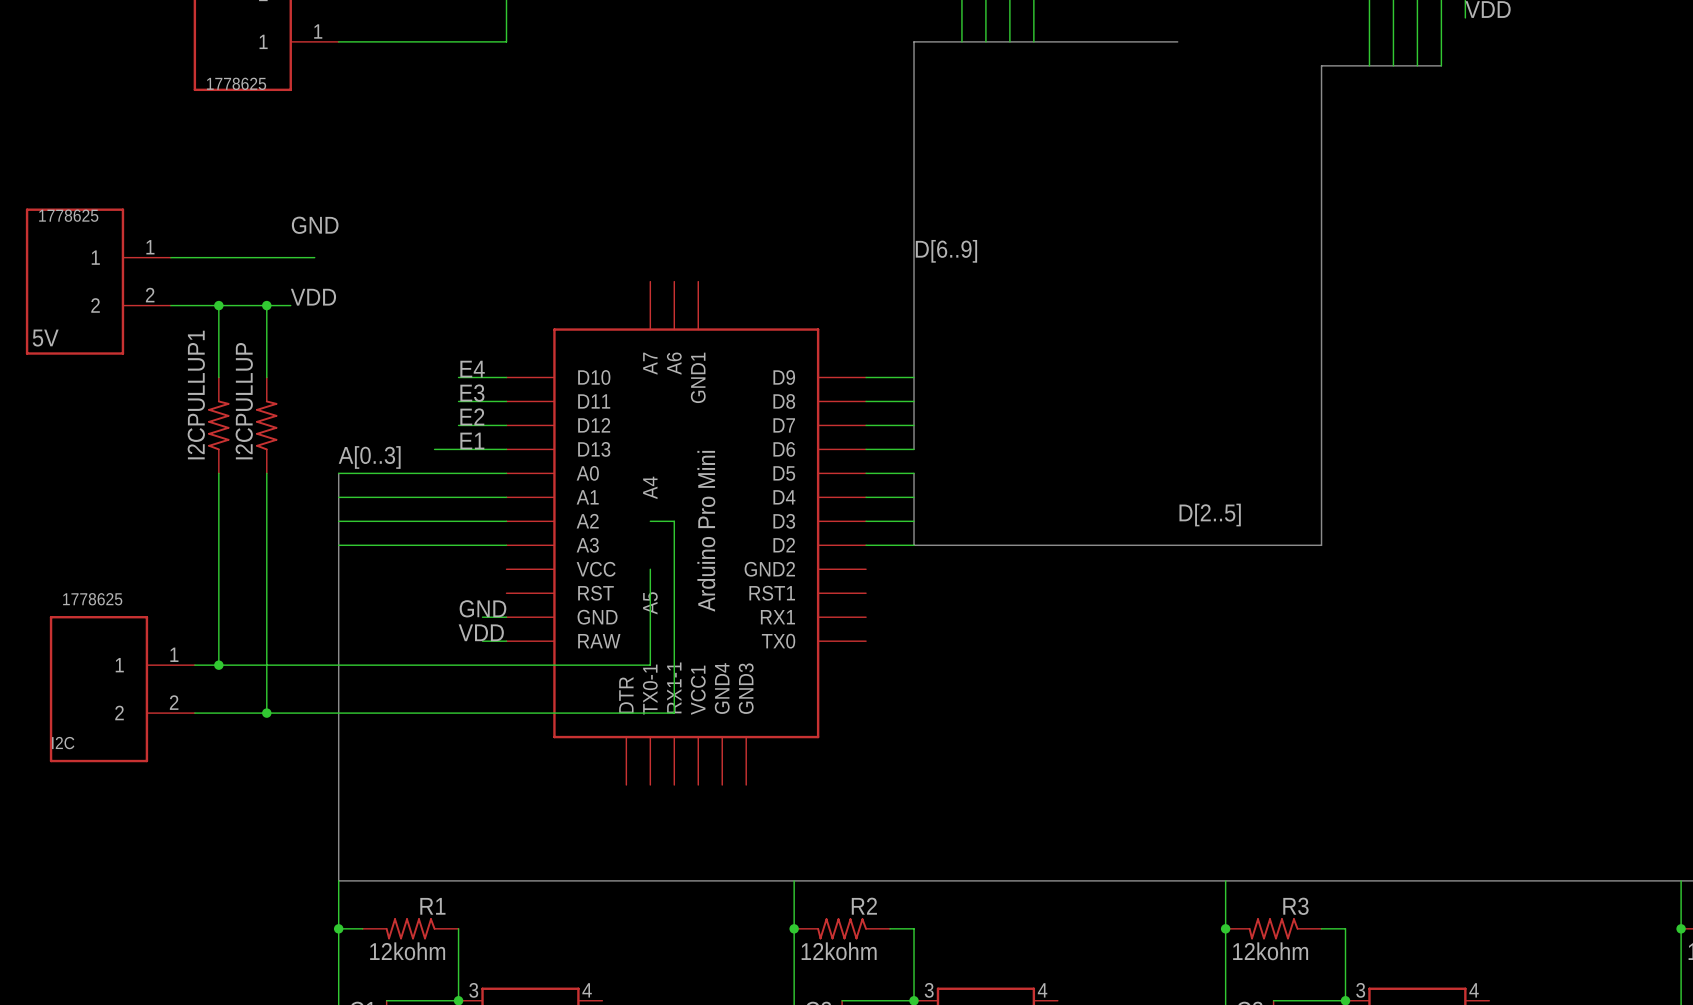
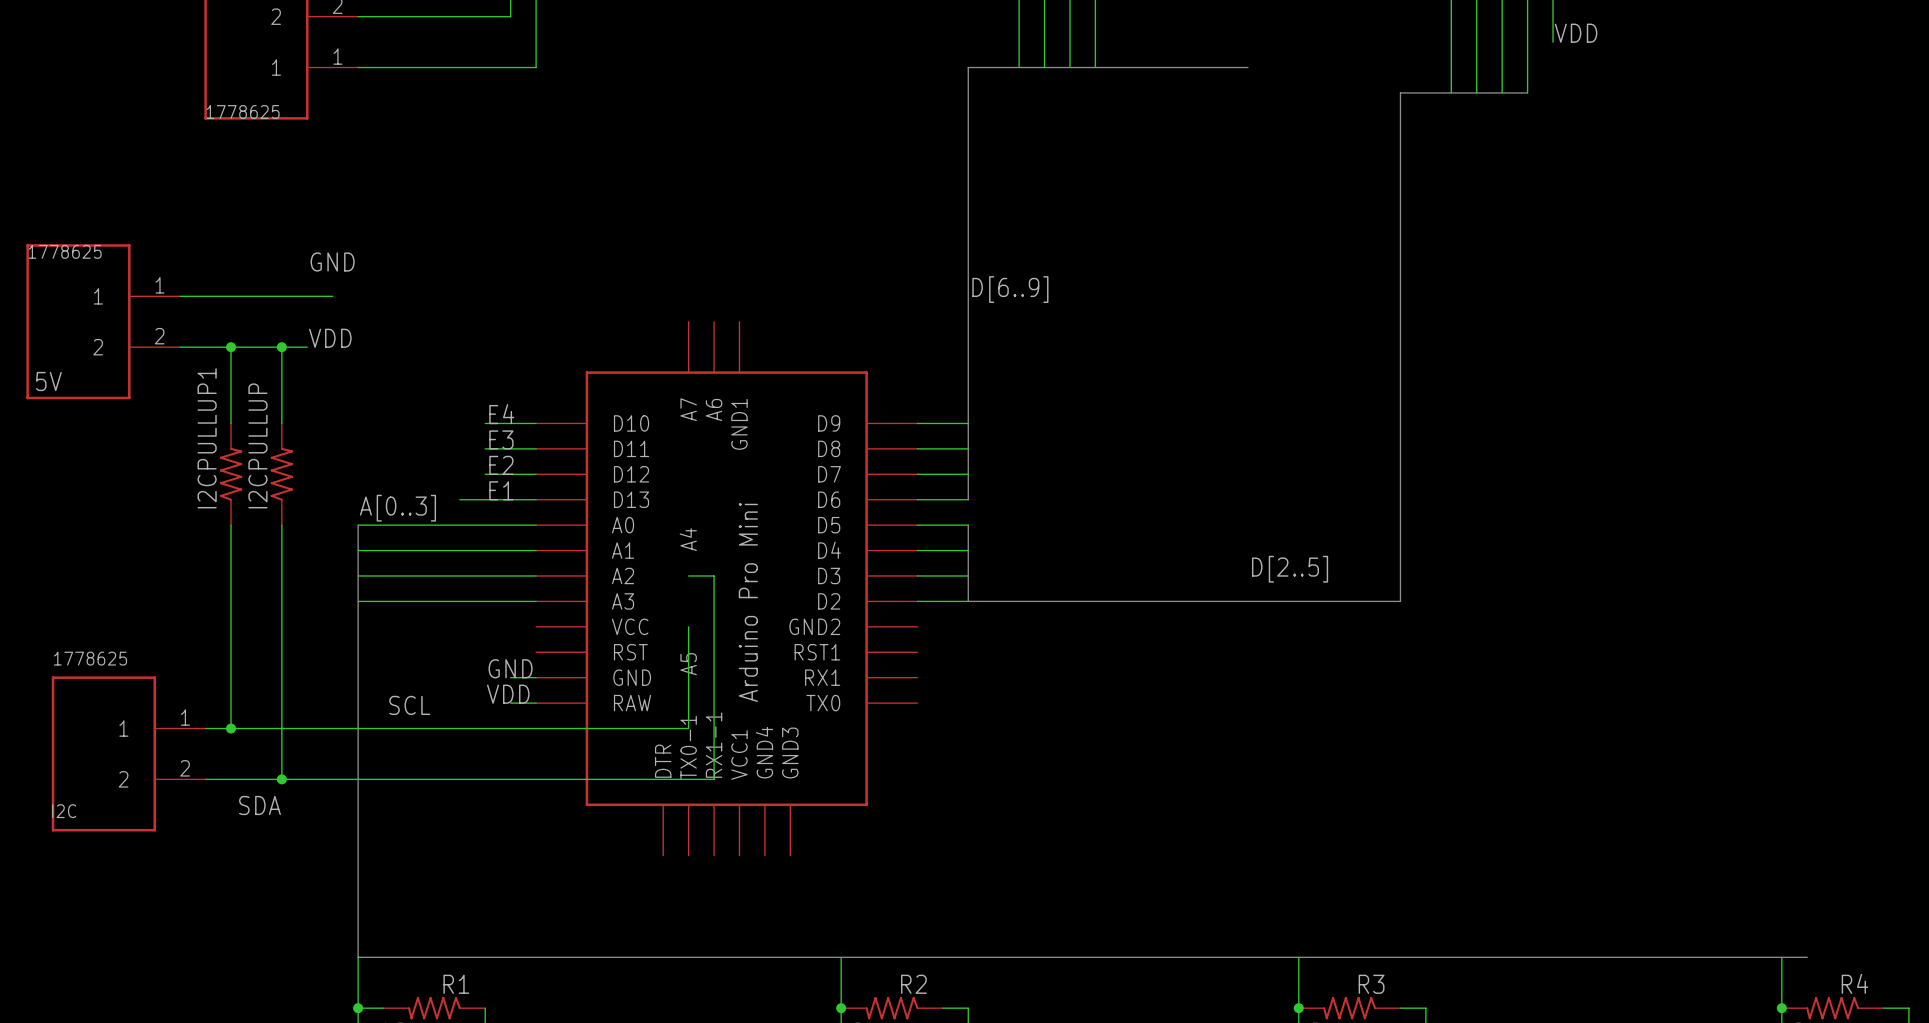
label: none -> SCL (409, 705)
label: none -> SDA (260, 805)

